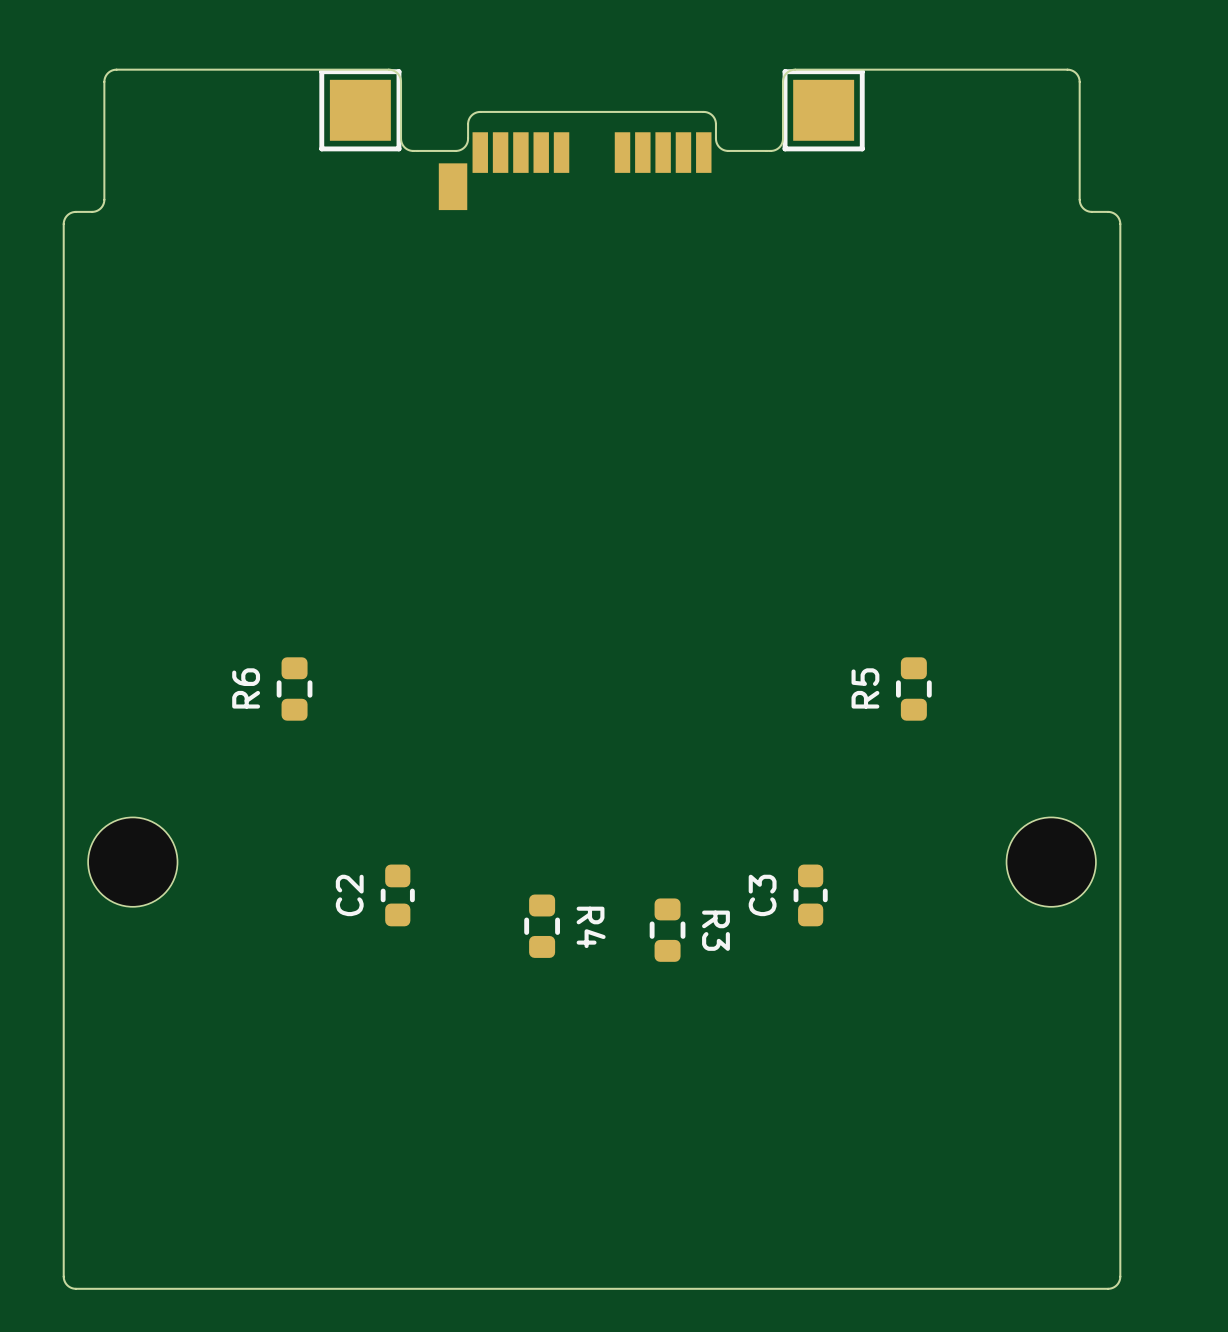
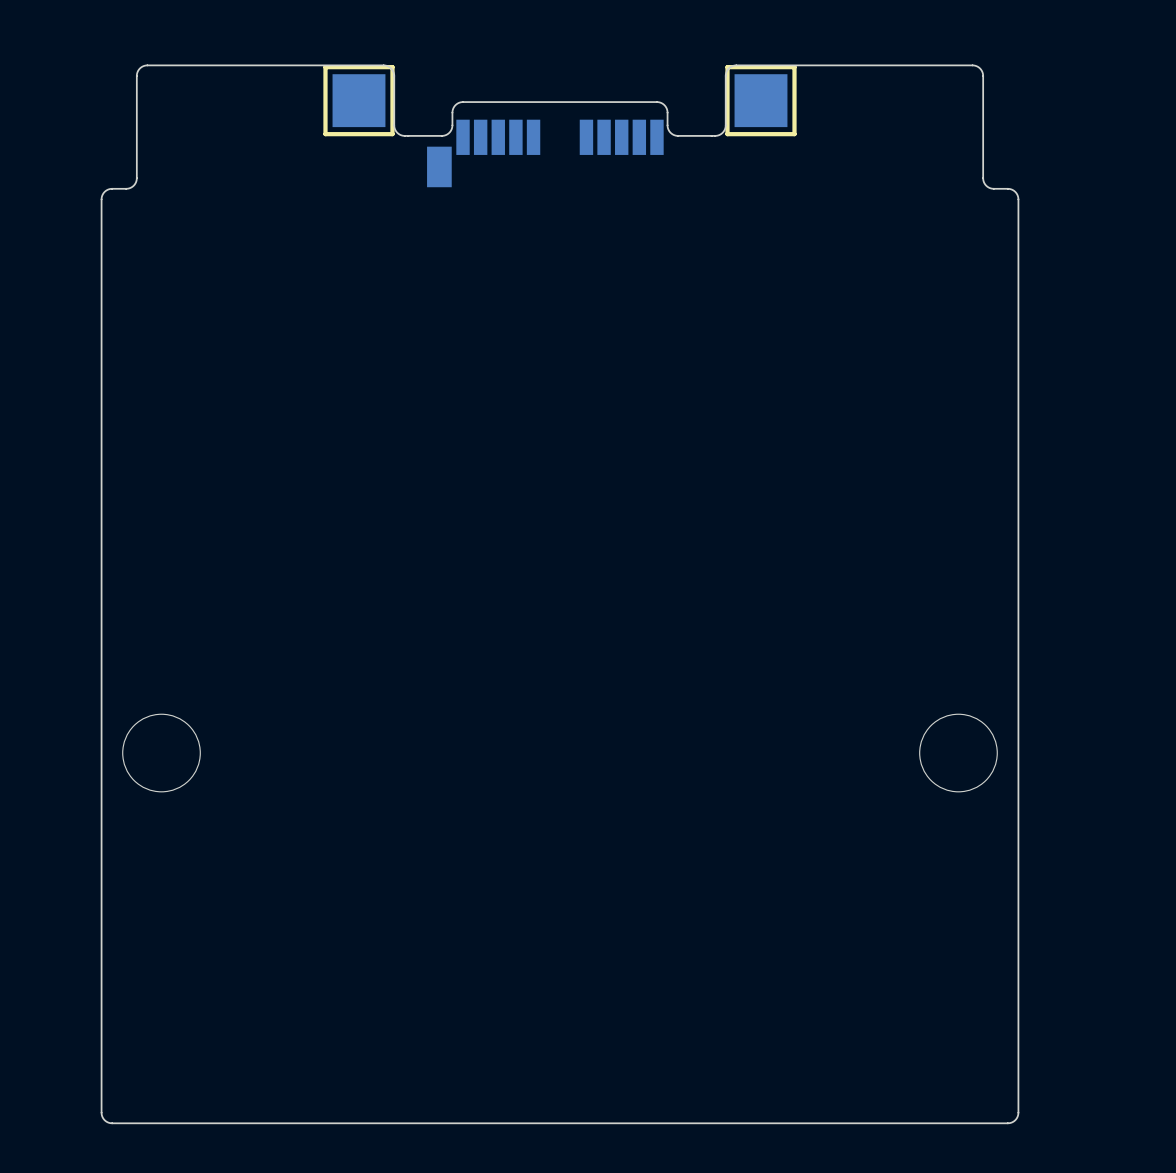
R6: (294, 688) -> none
R5: (913, 688) -> none
C2: (397, 895) -> none
C3: (810, 895) -> none
R4: (542, 926) -> none
R3: (667, 930) -> none

